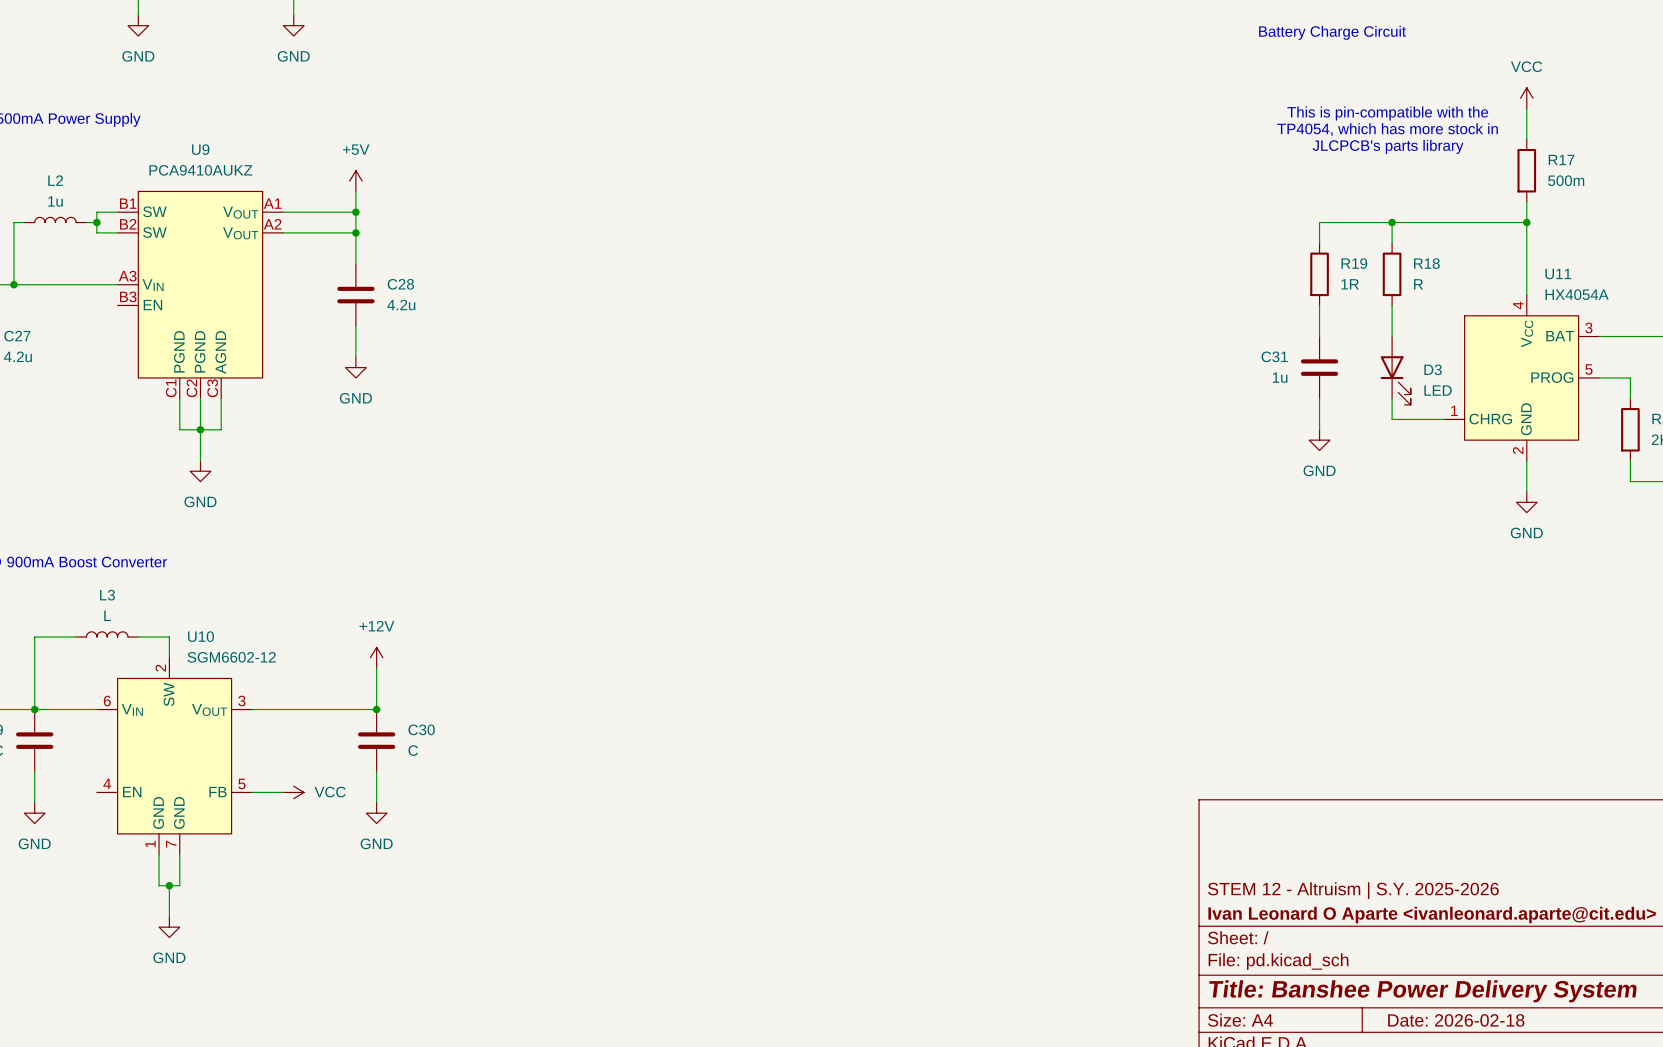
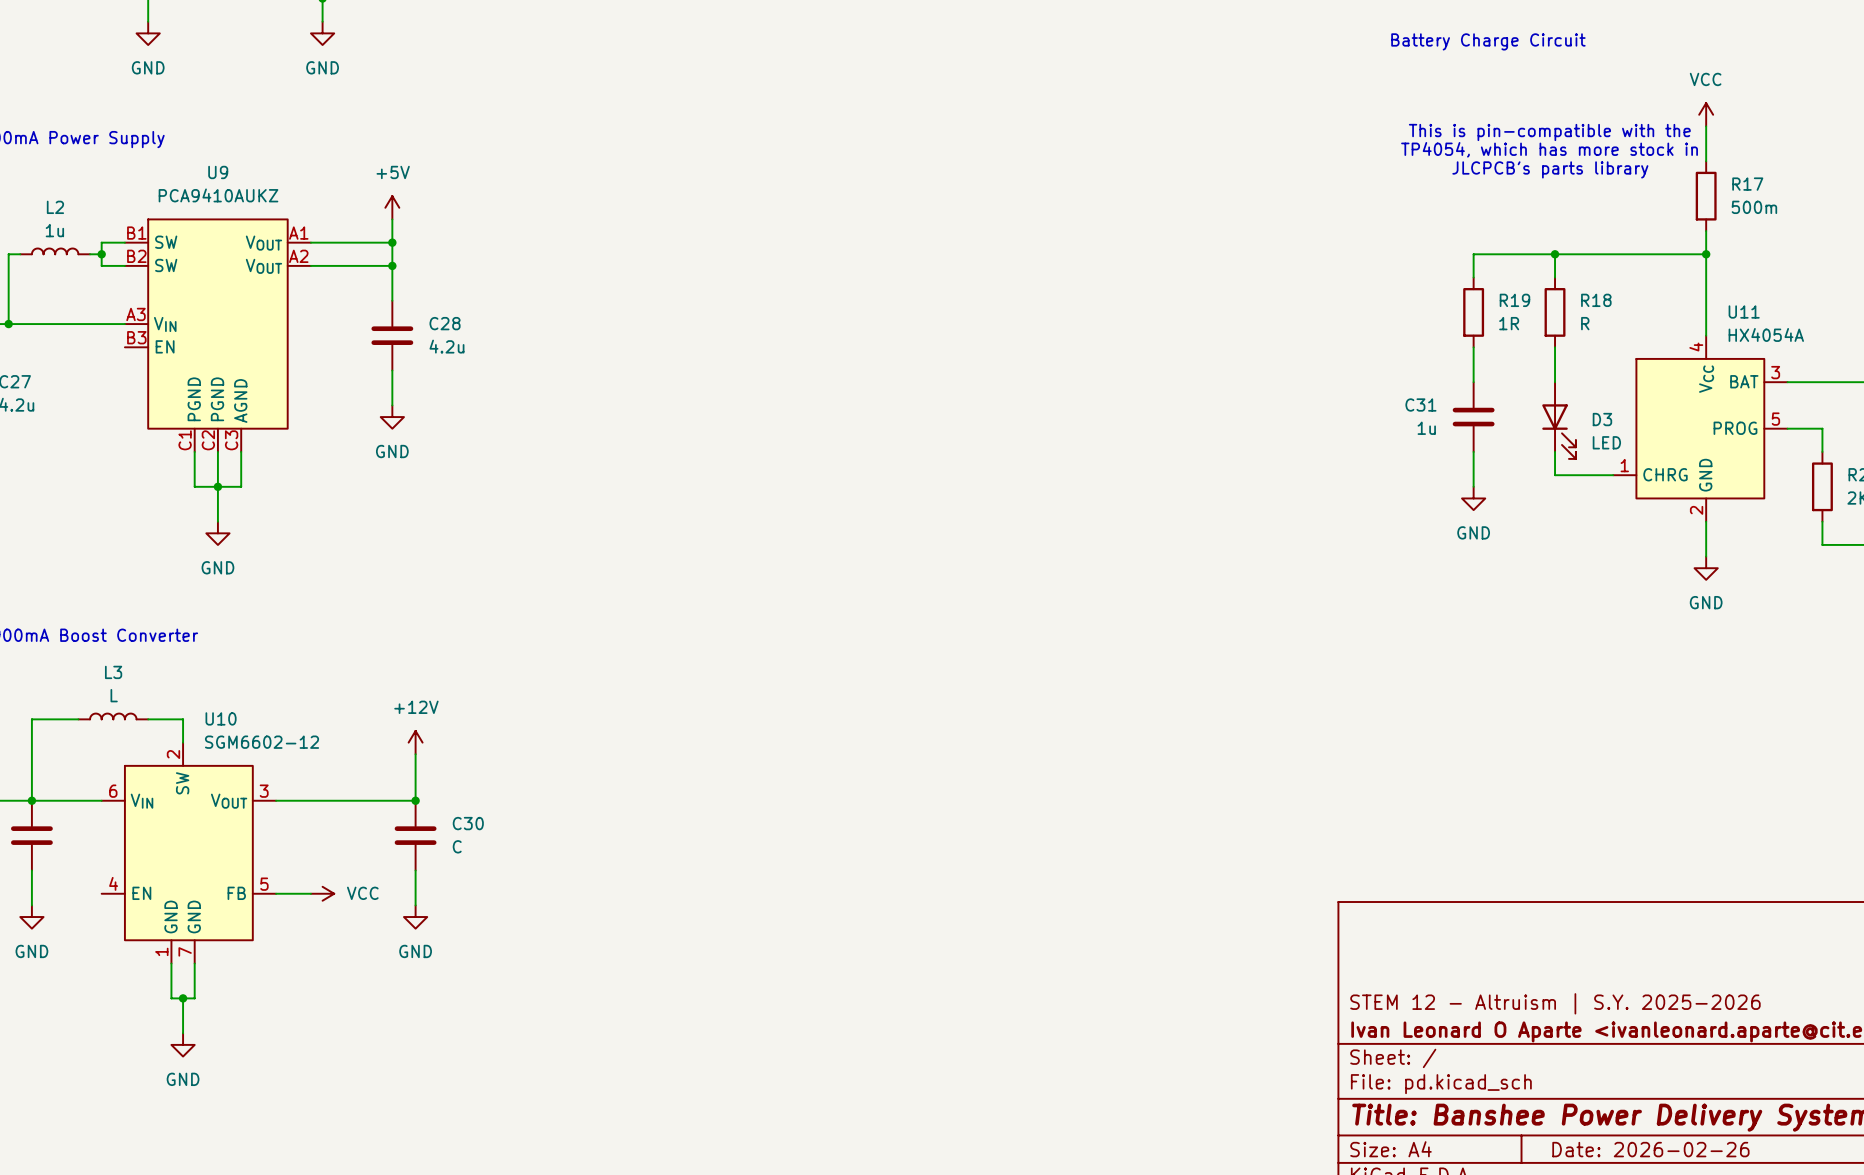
title block: Date: 2026-02-18 (1456, 1020) -> Date: 2026-02-26 (1650, 1149)

